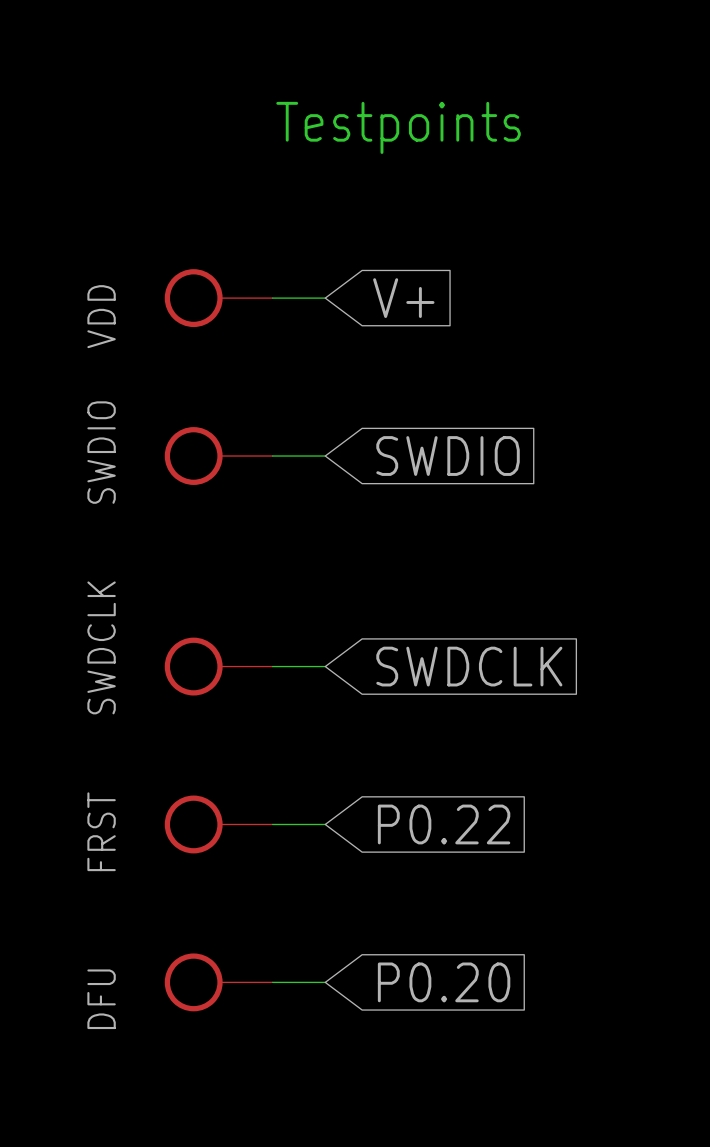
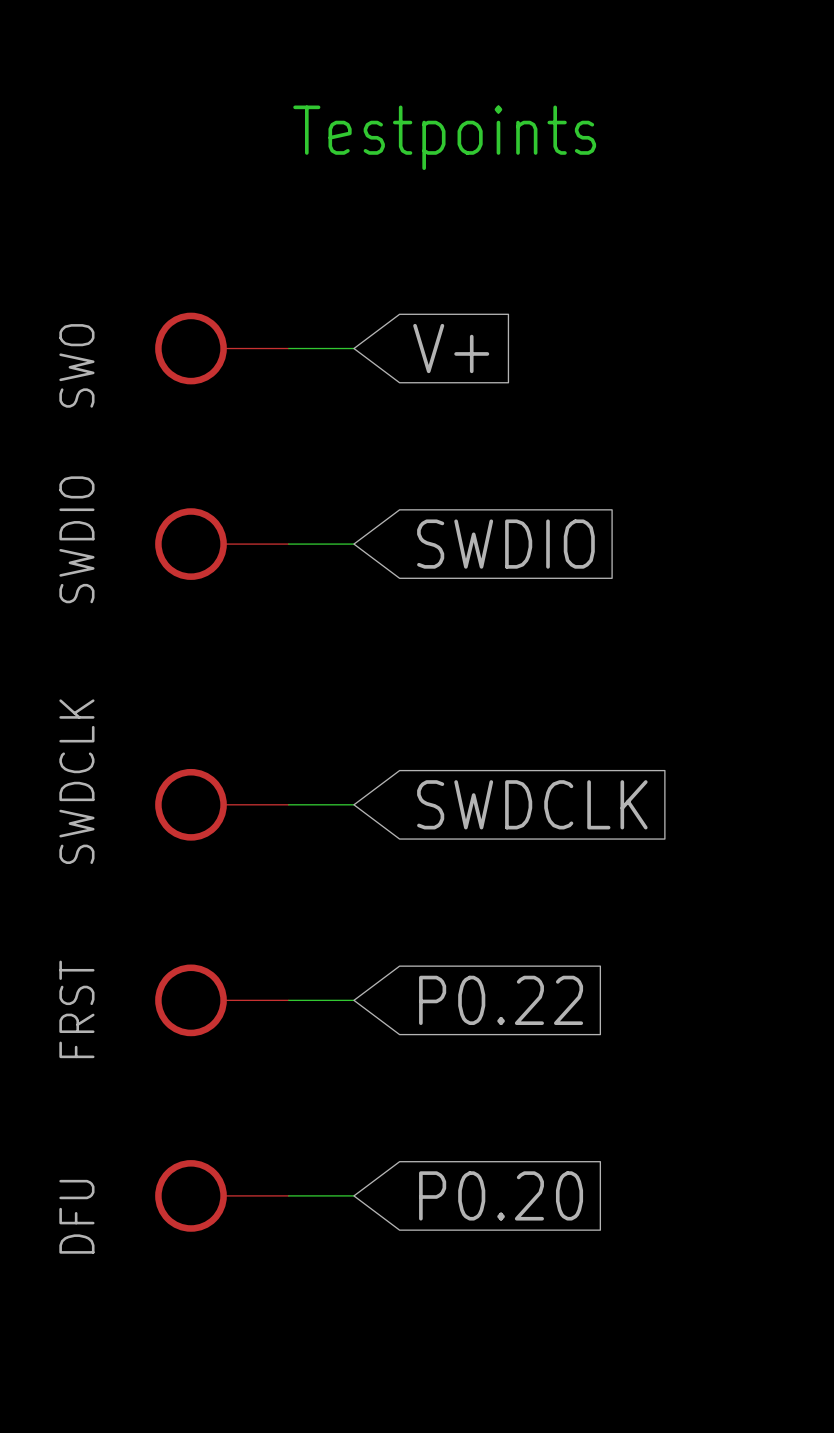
VDD name: VDD (101, 316) -> SWO (76, 365)

